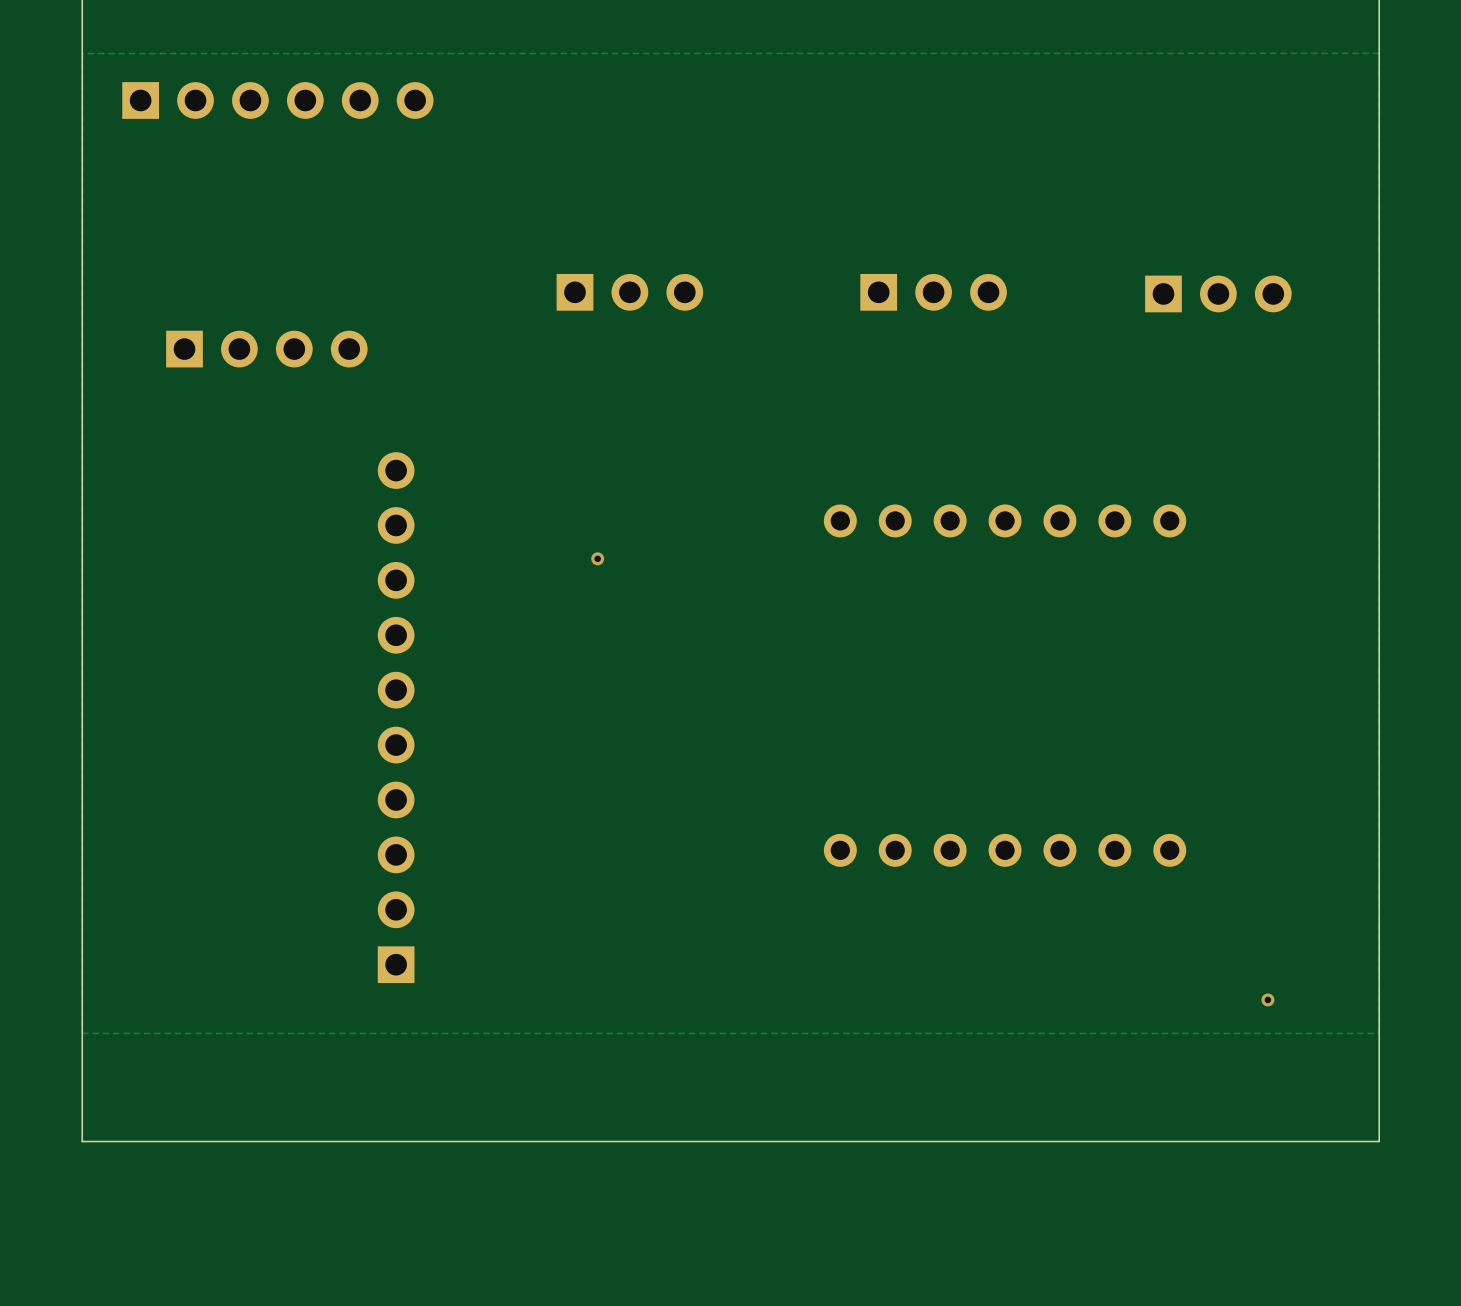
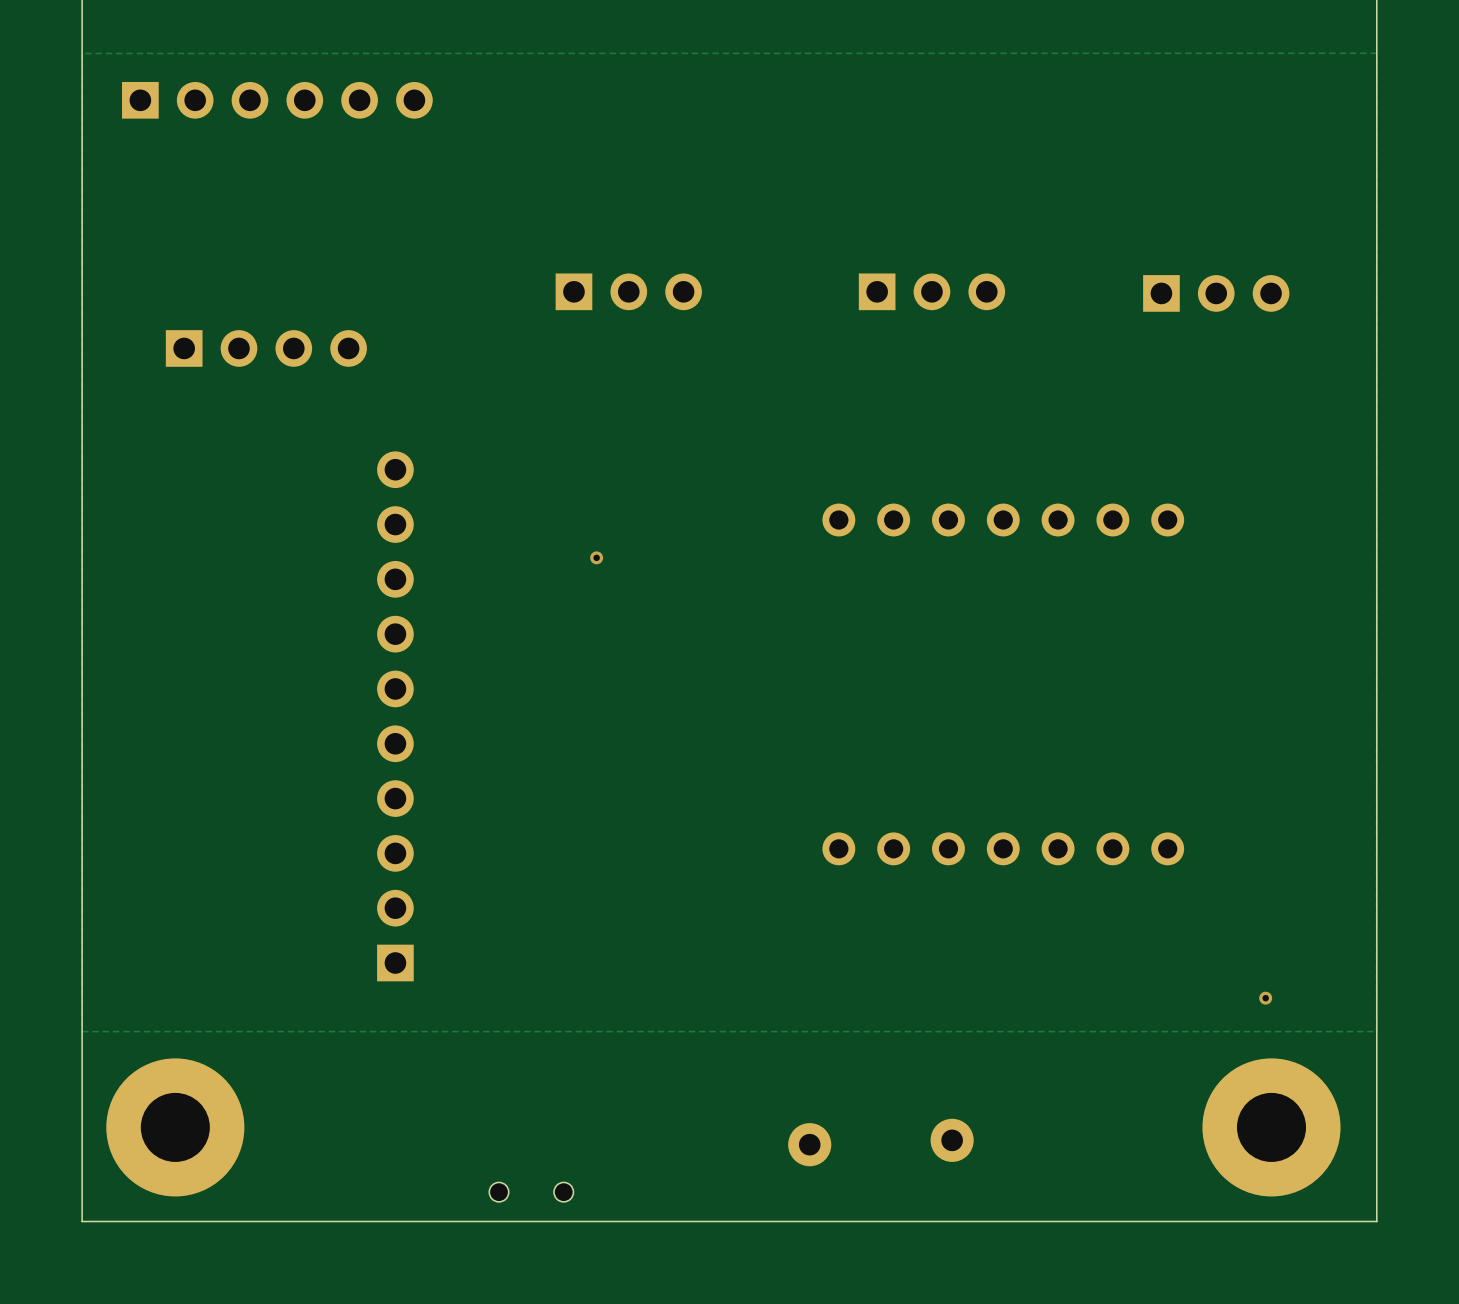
part: none -> (175, 1127)
part: none -> (1271, 1127)
board edge: (1379, 1141) (82, 1141) -> (1376, 1139) (1376, 1221) (82, 1221) (82, 1139)
part: none -> (952, 1140)
part: none -> (809, 1144)
part: none -> (531, 1192)

